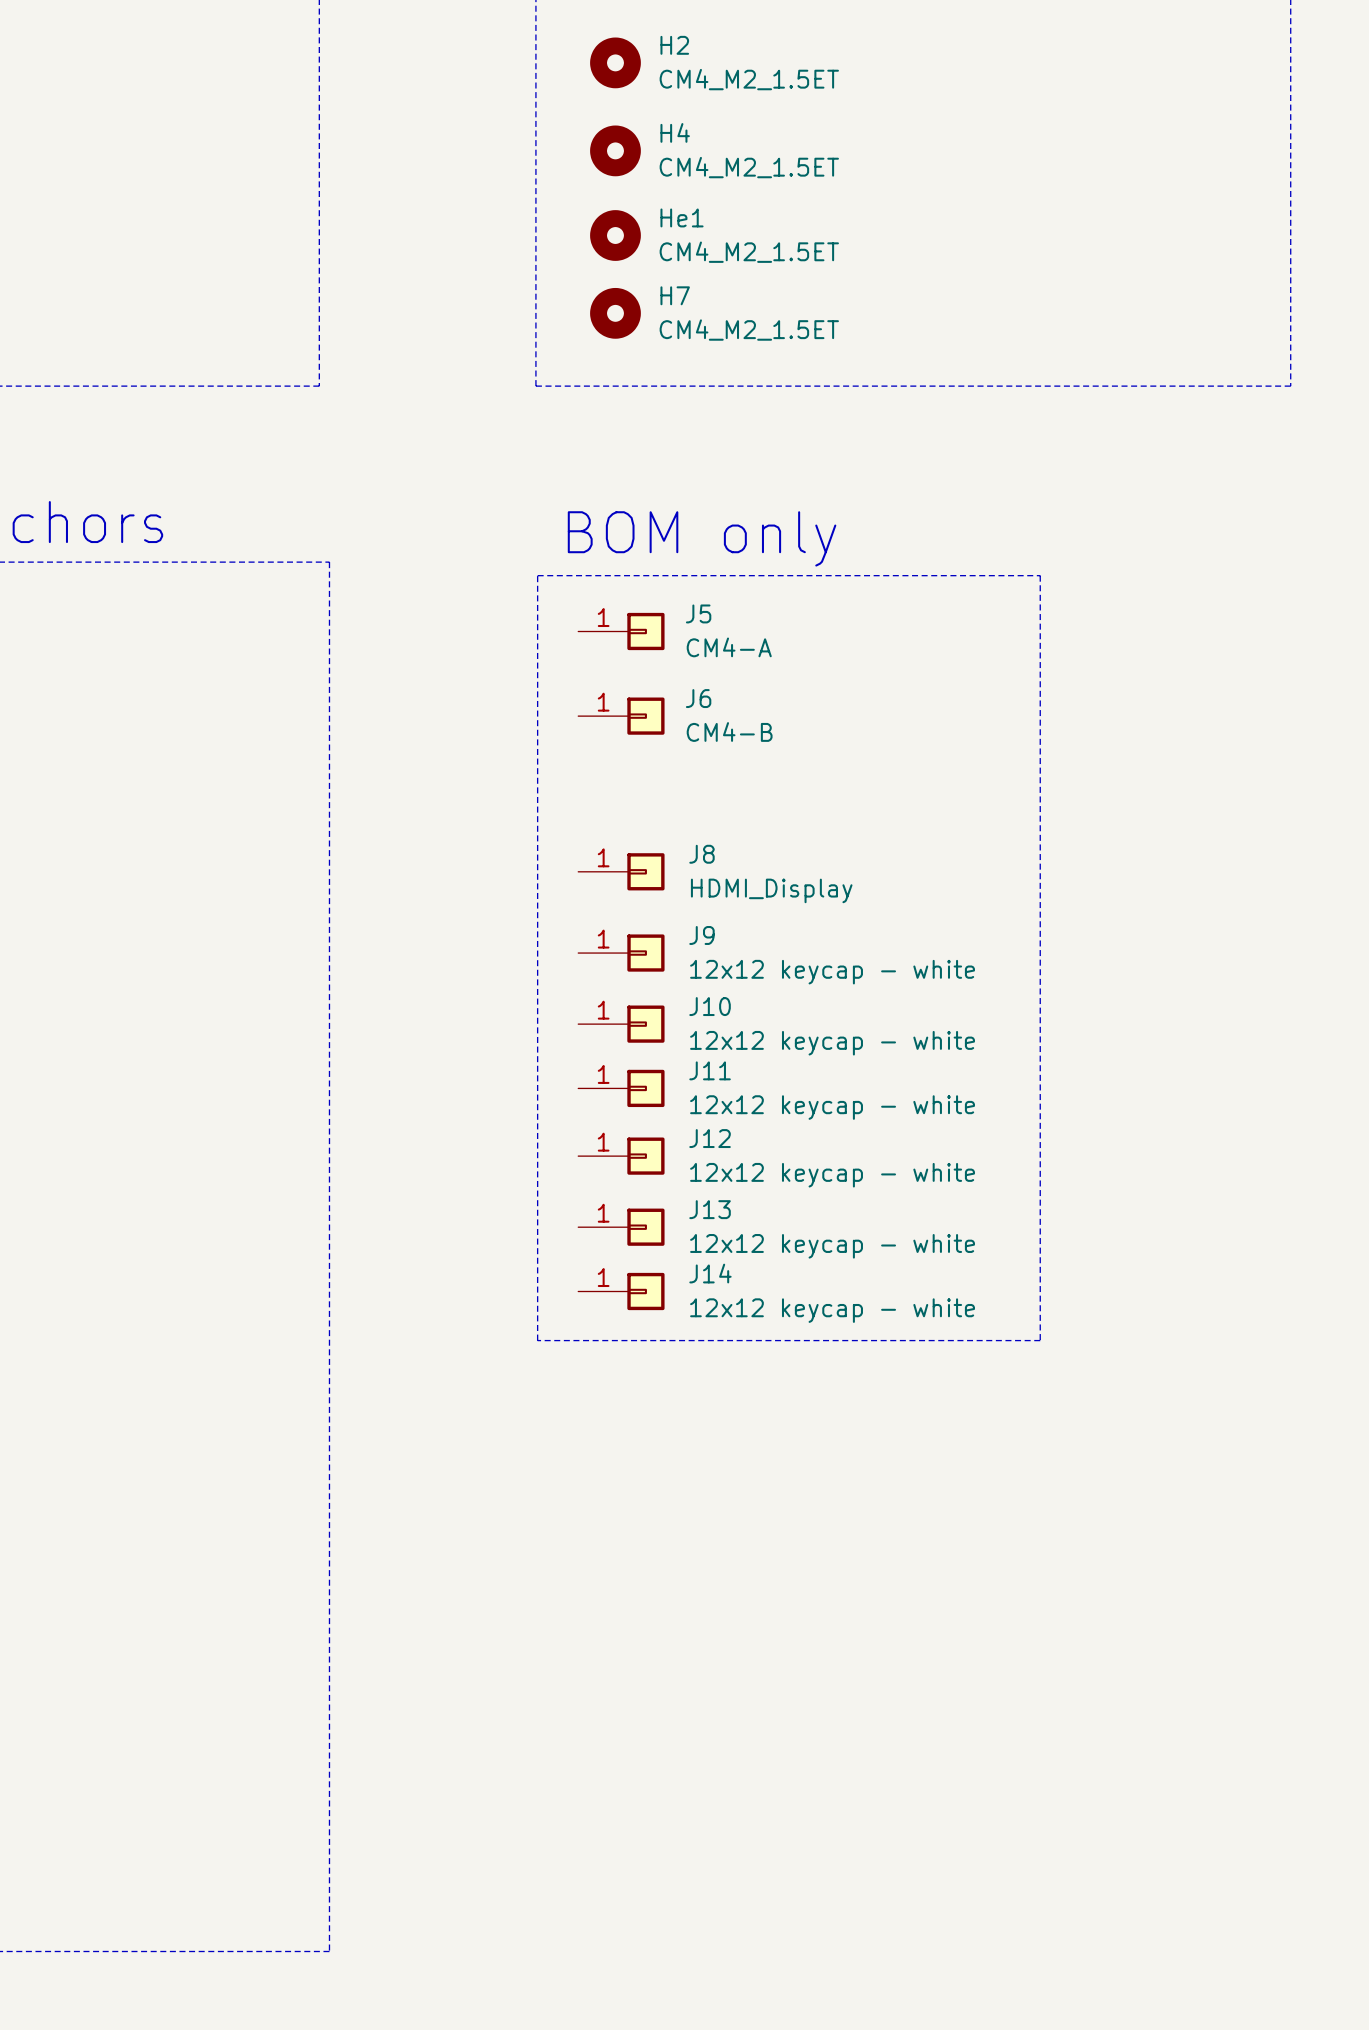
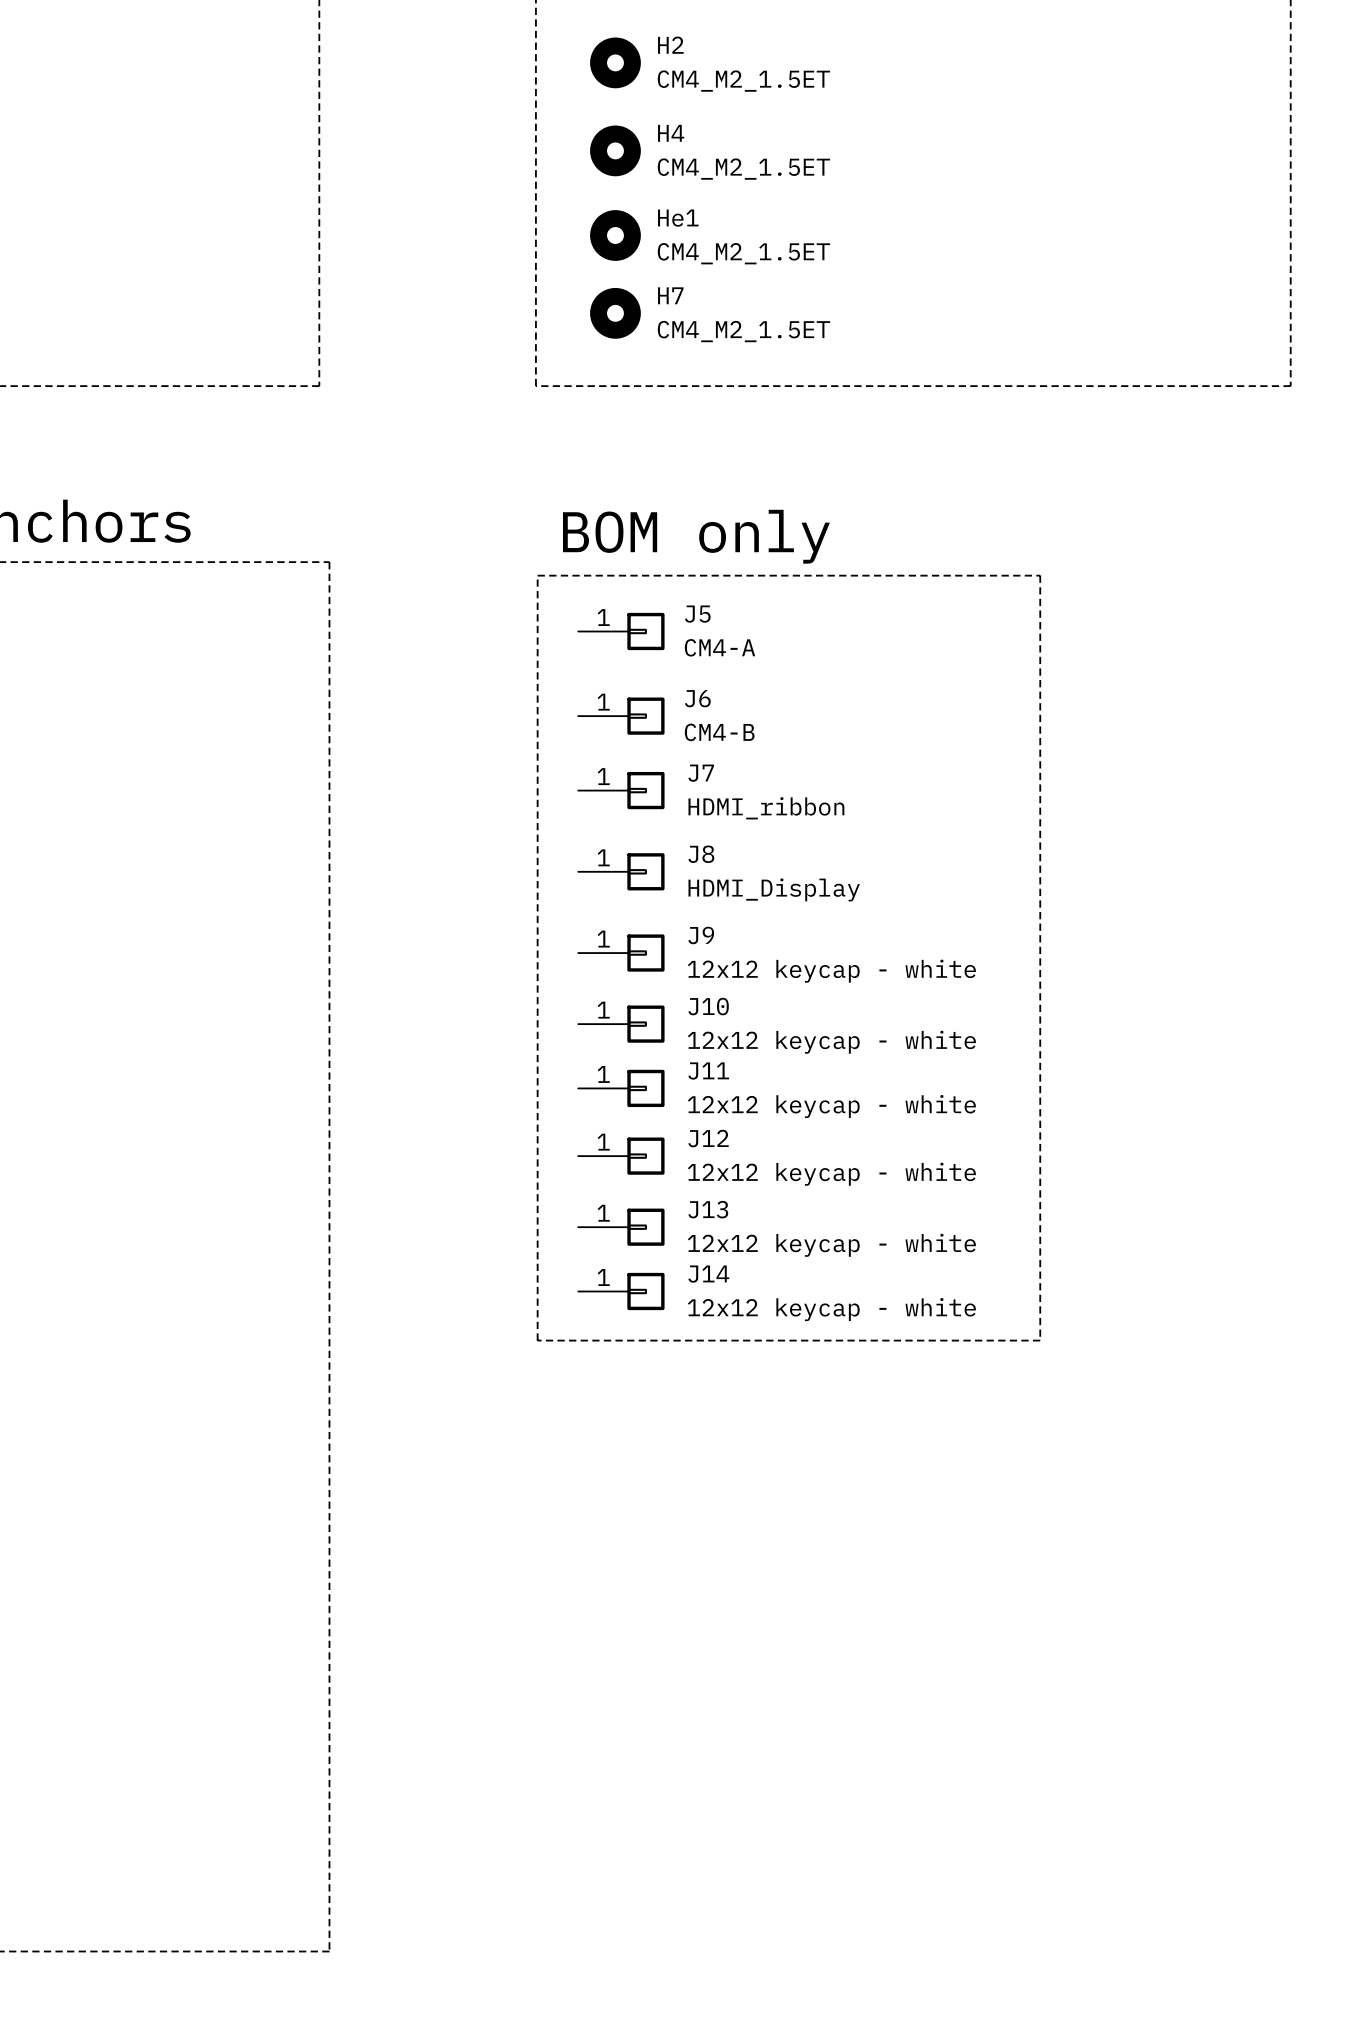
J7: none -> HDMI_ribbon (621, 790)

